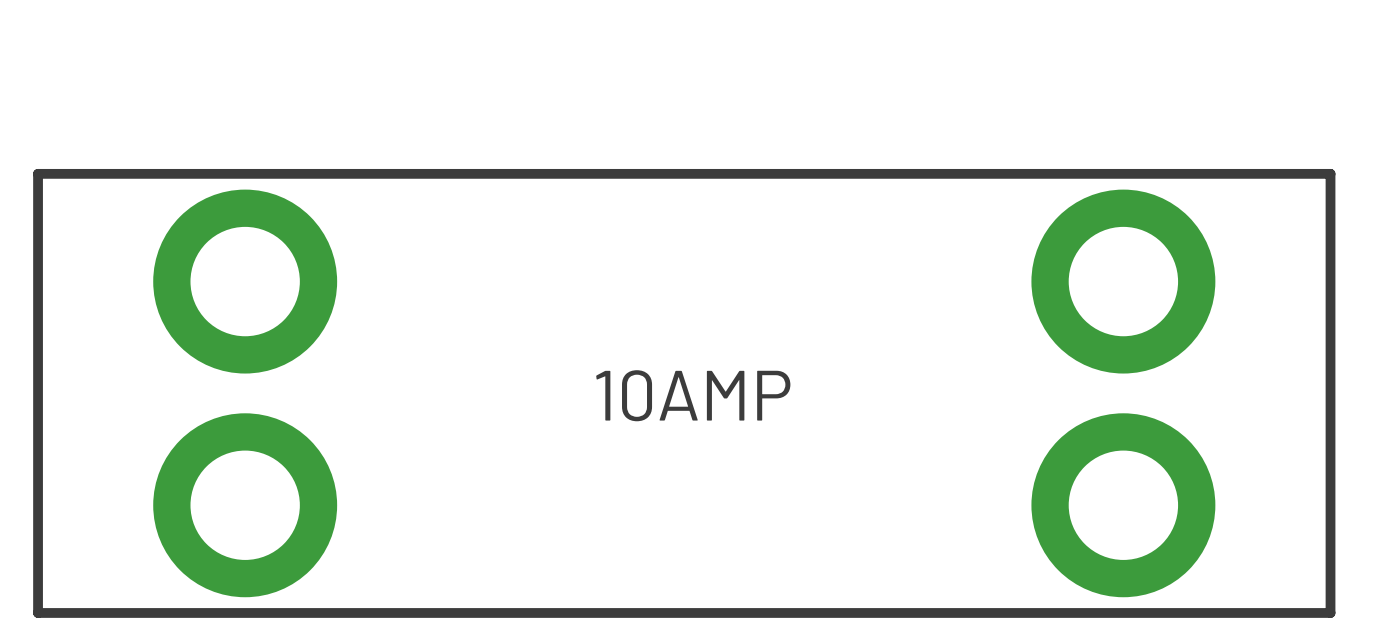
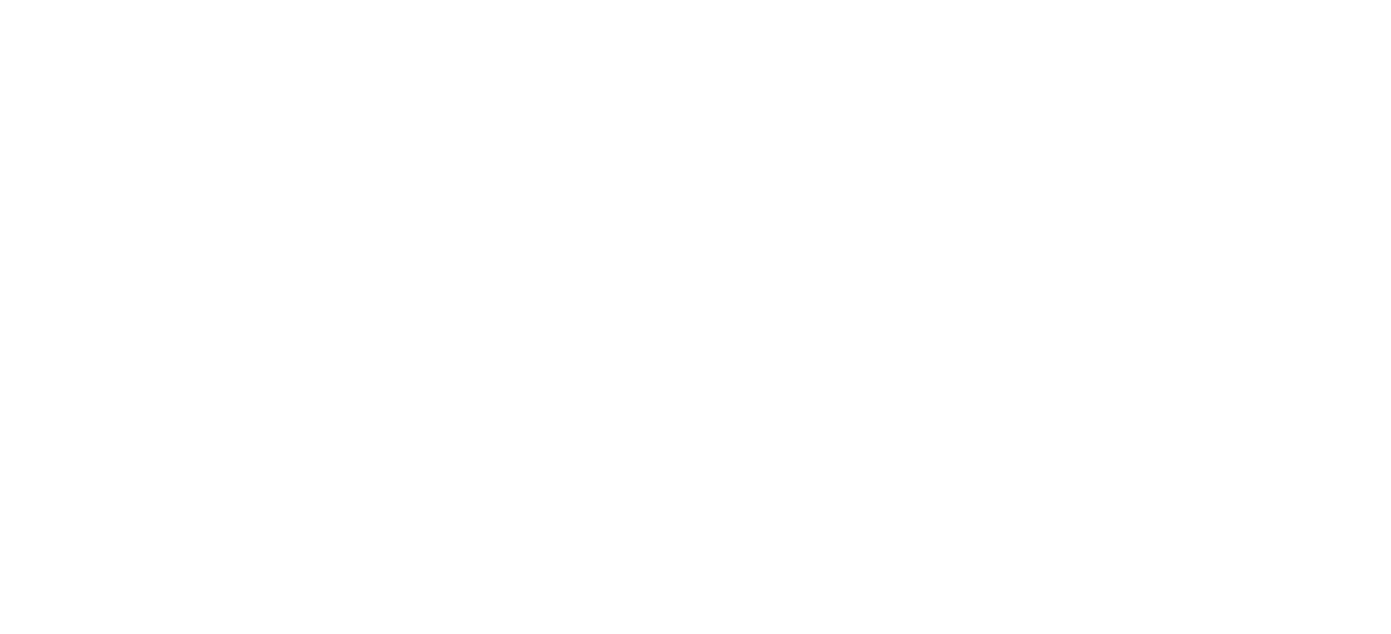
part: 10AMP (684, 393) -> none

